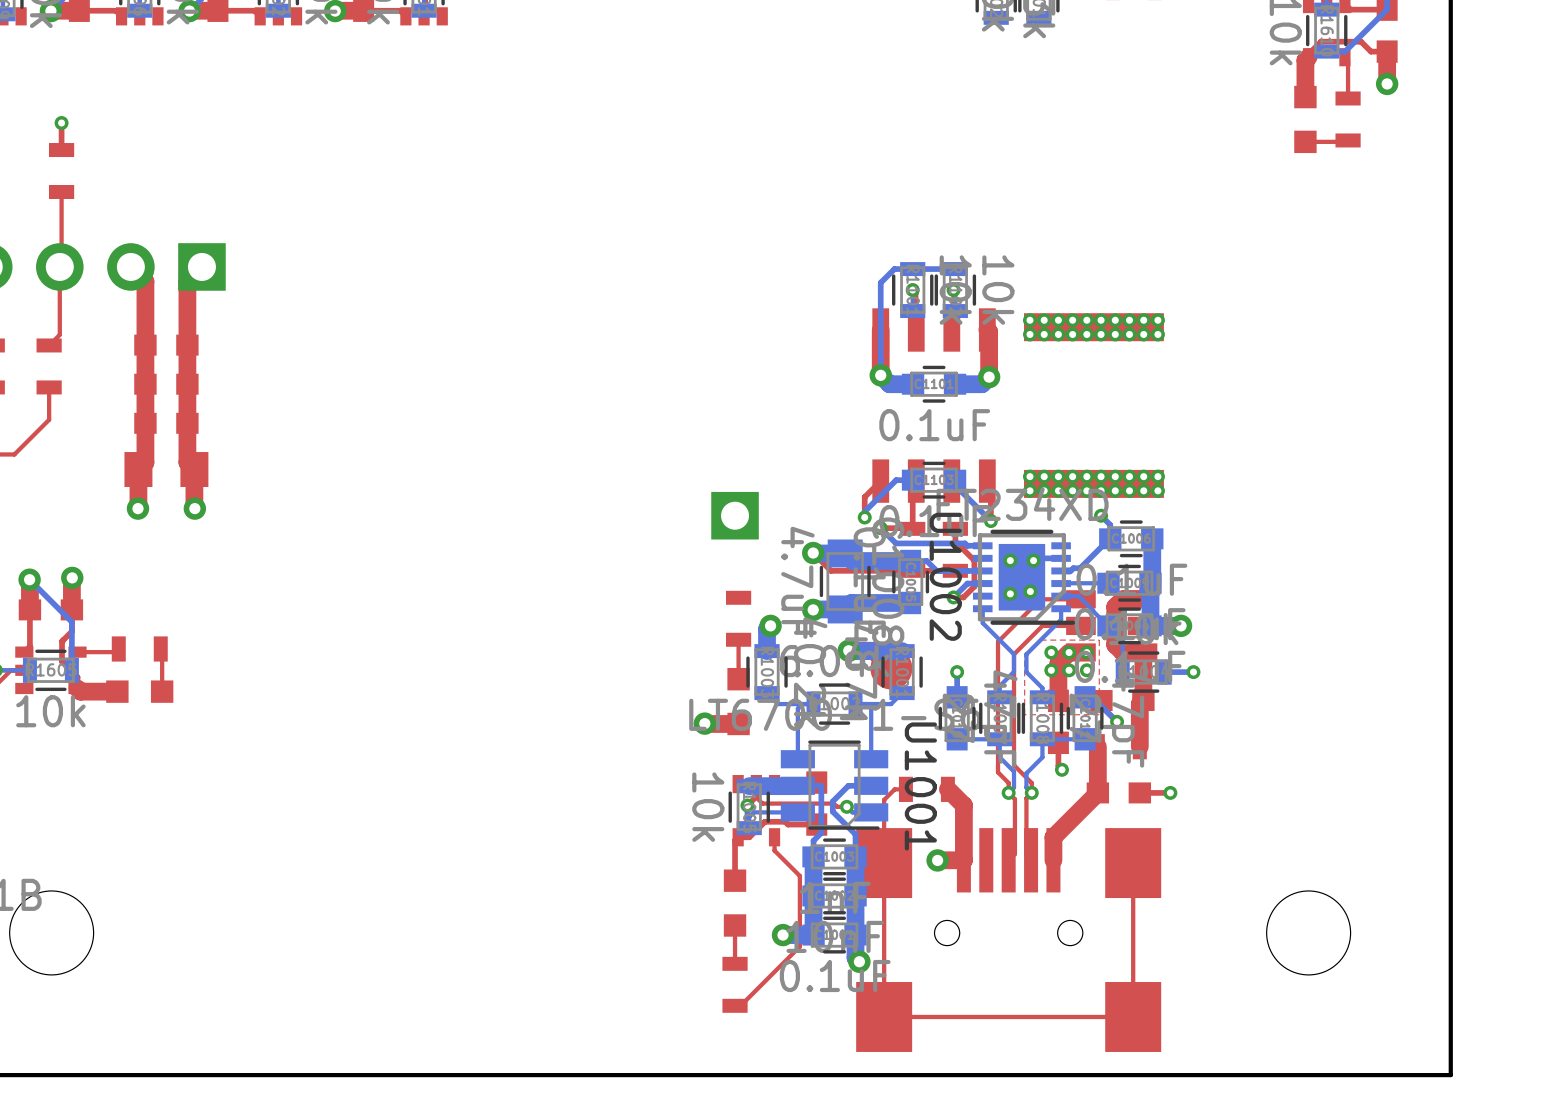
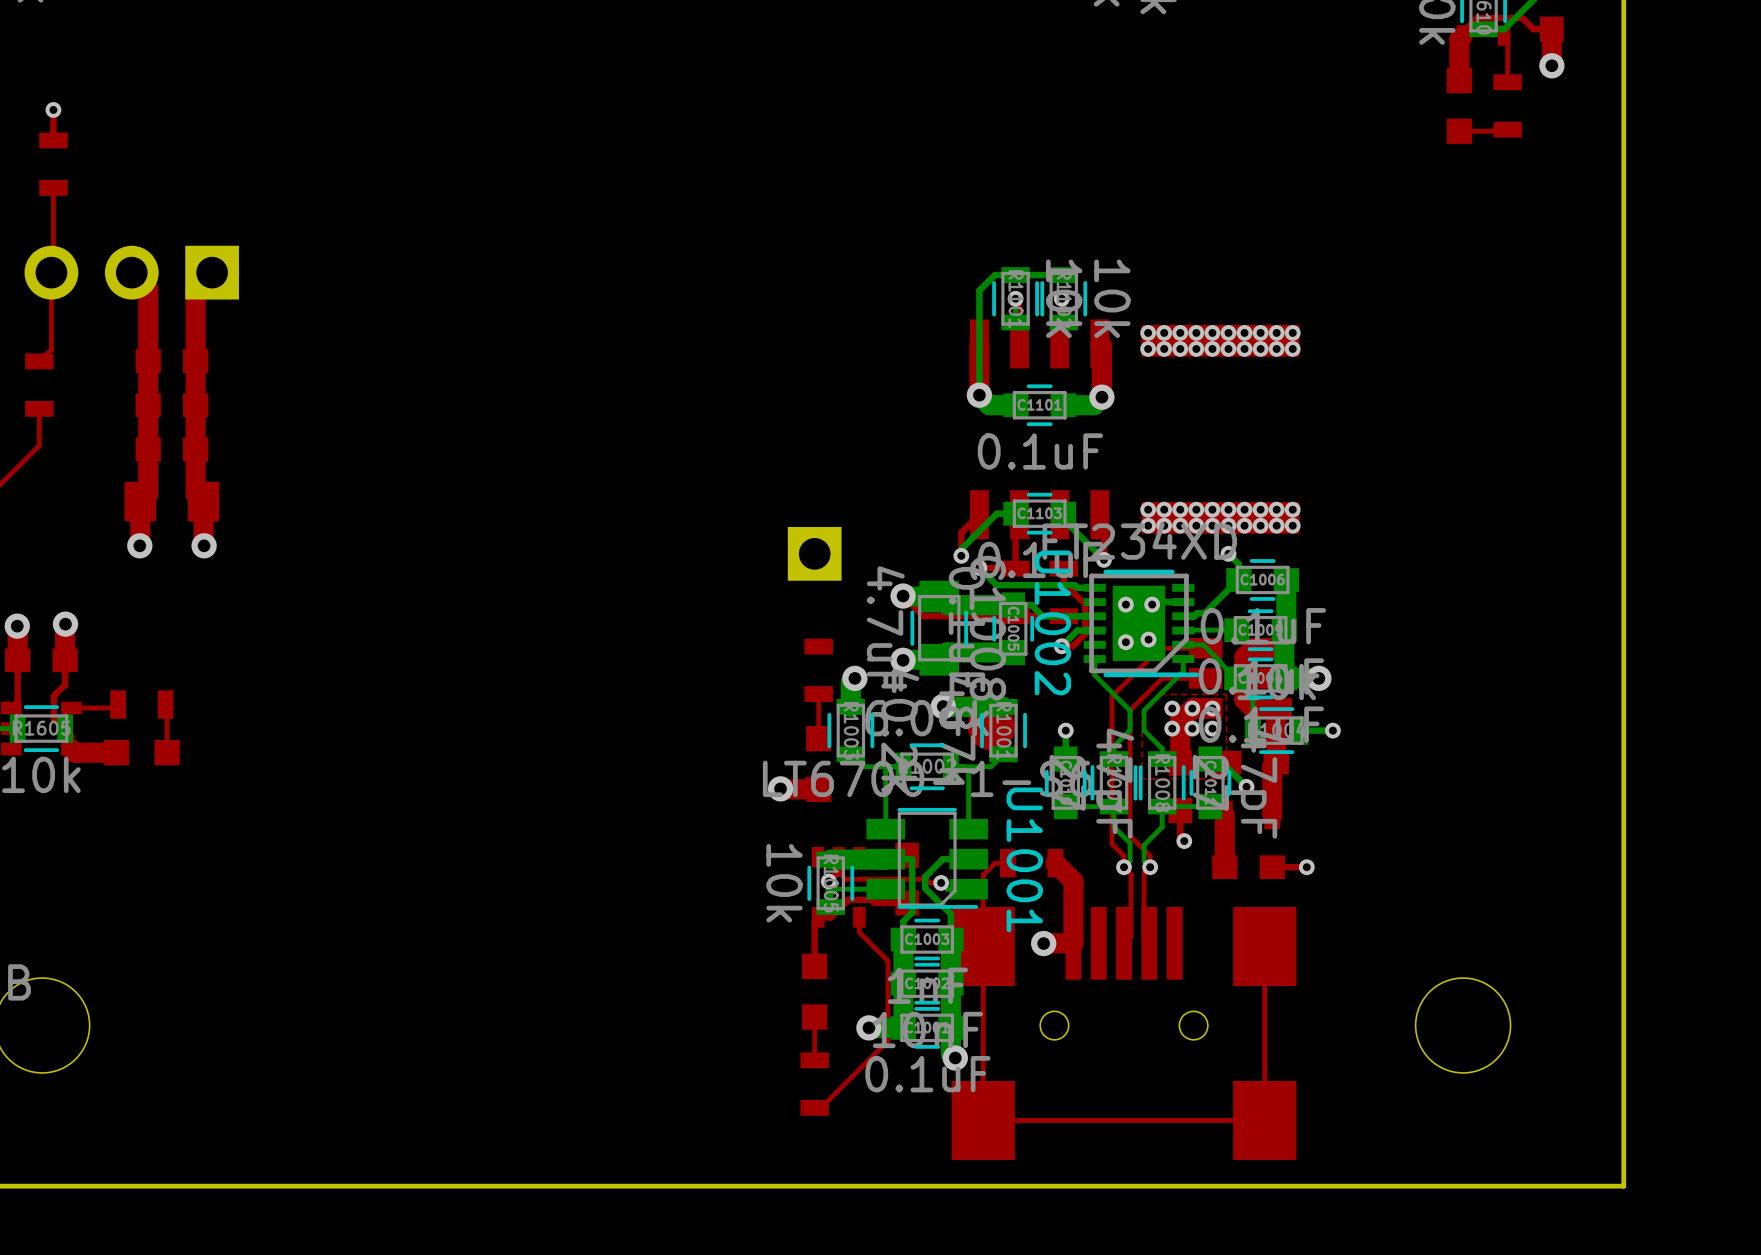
bottom track: (29, 579) (71, 622) (71, 670) -> none
top track: (1097, 792) (1053, 837) (1053, 860) -> none

